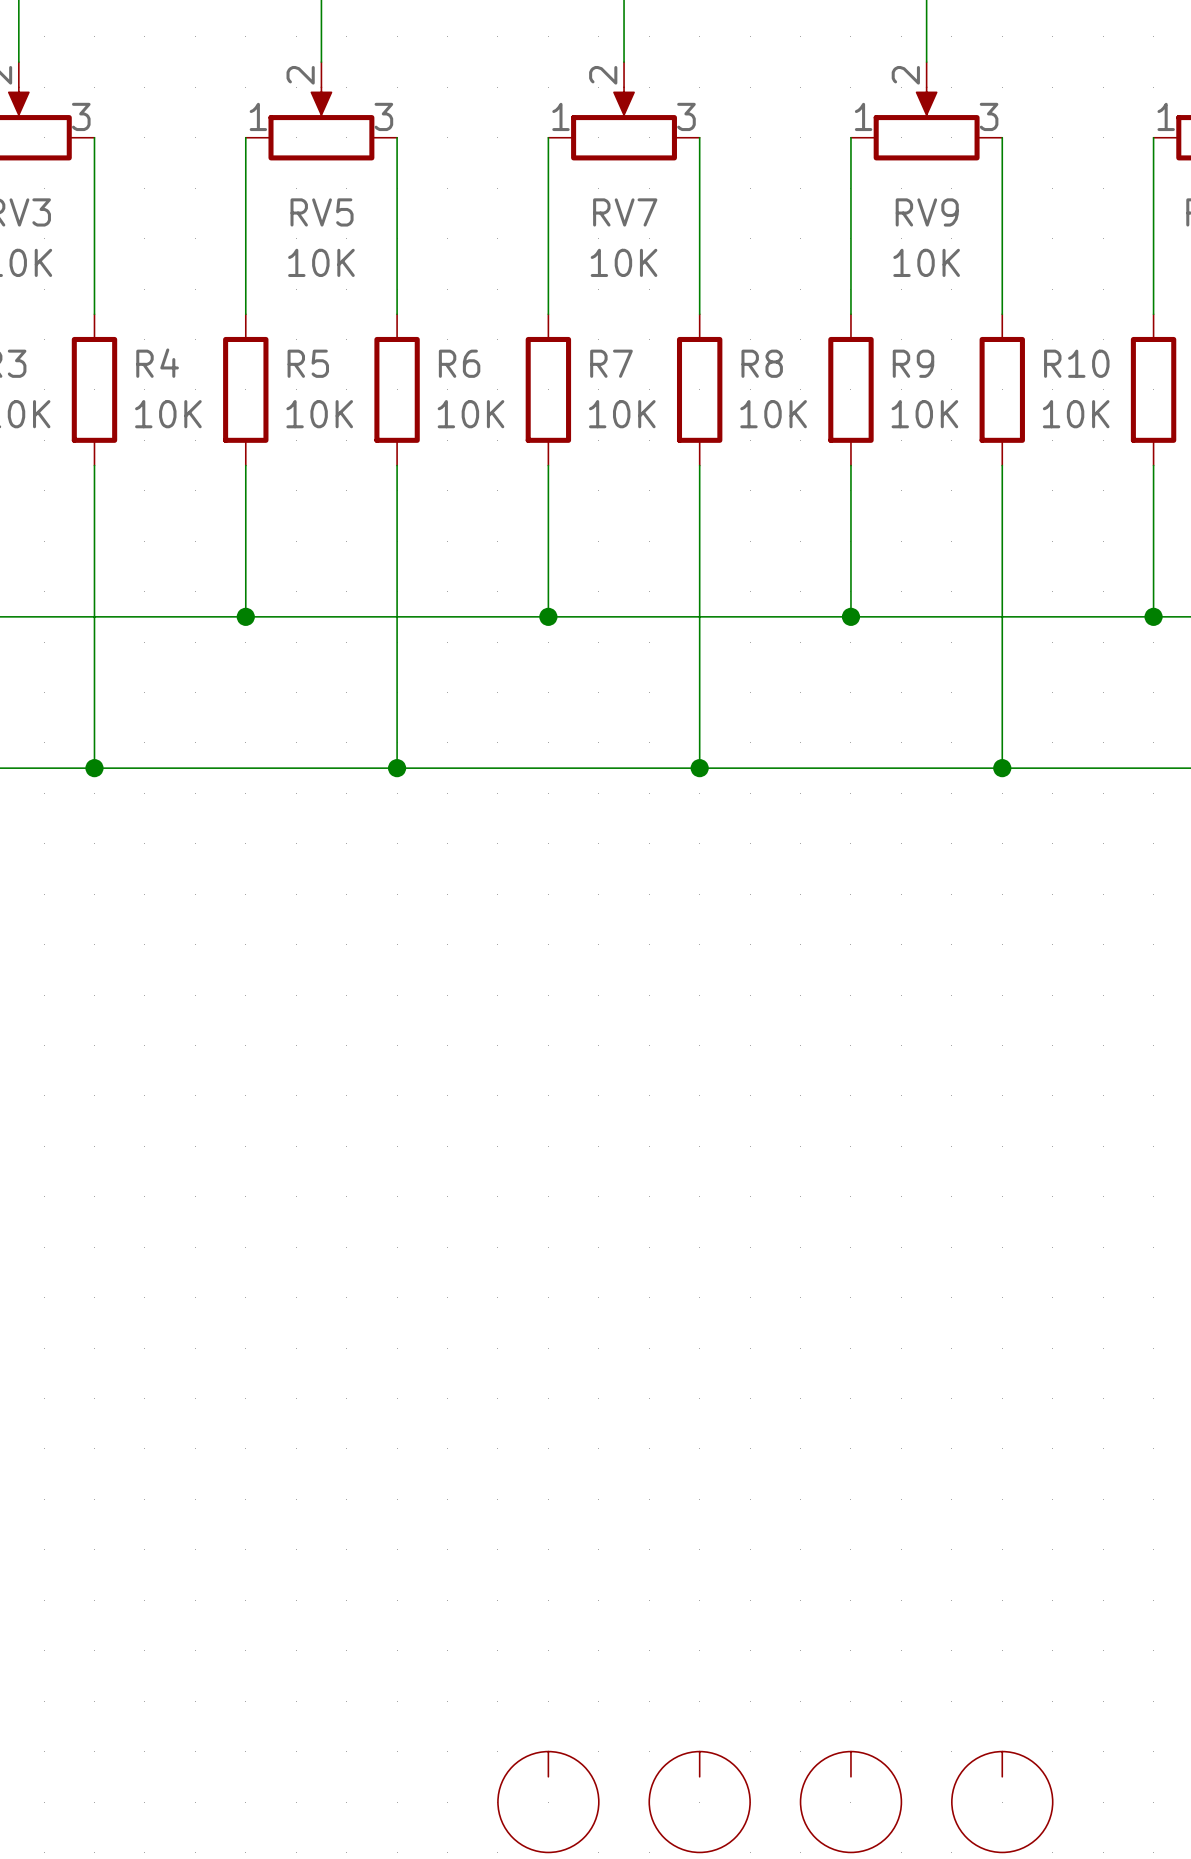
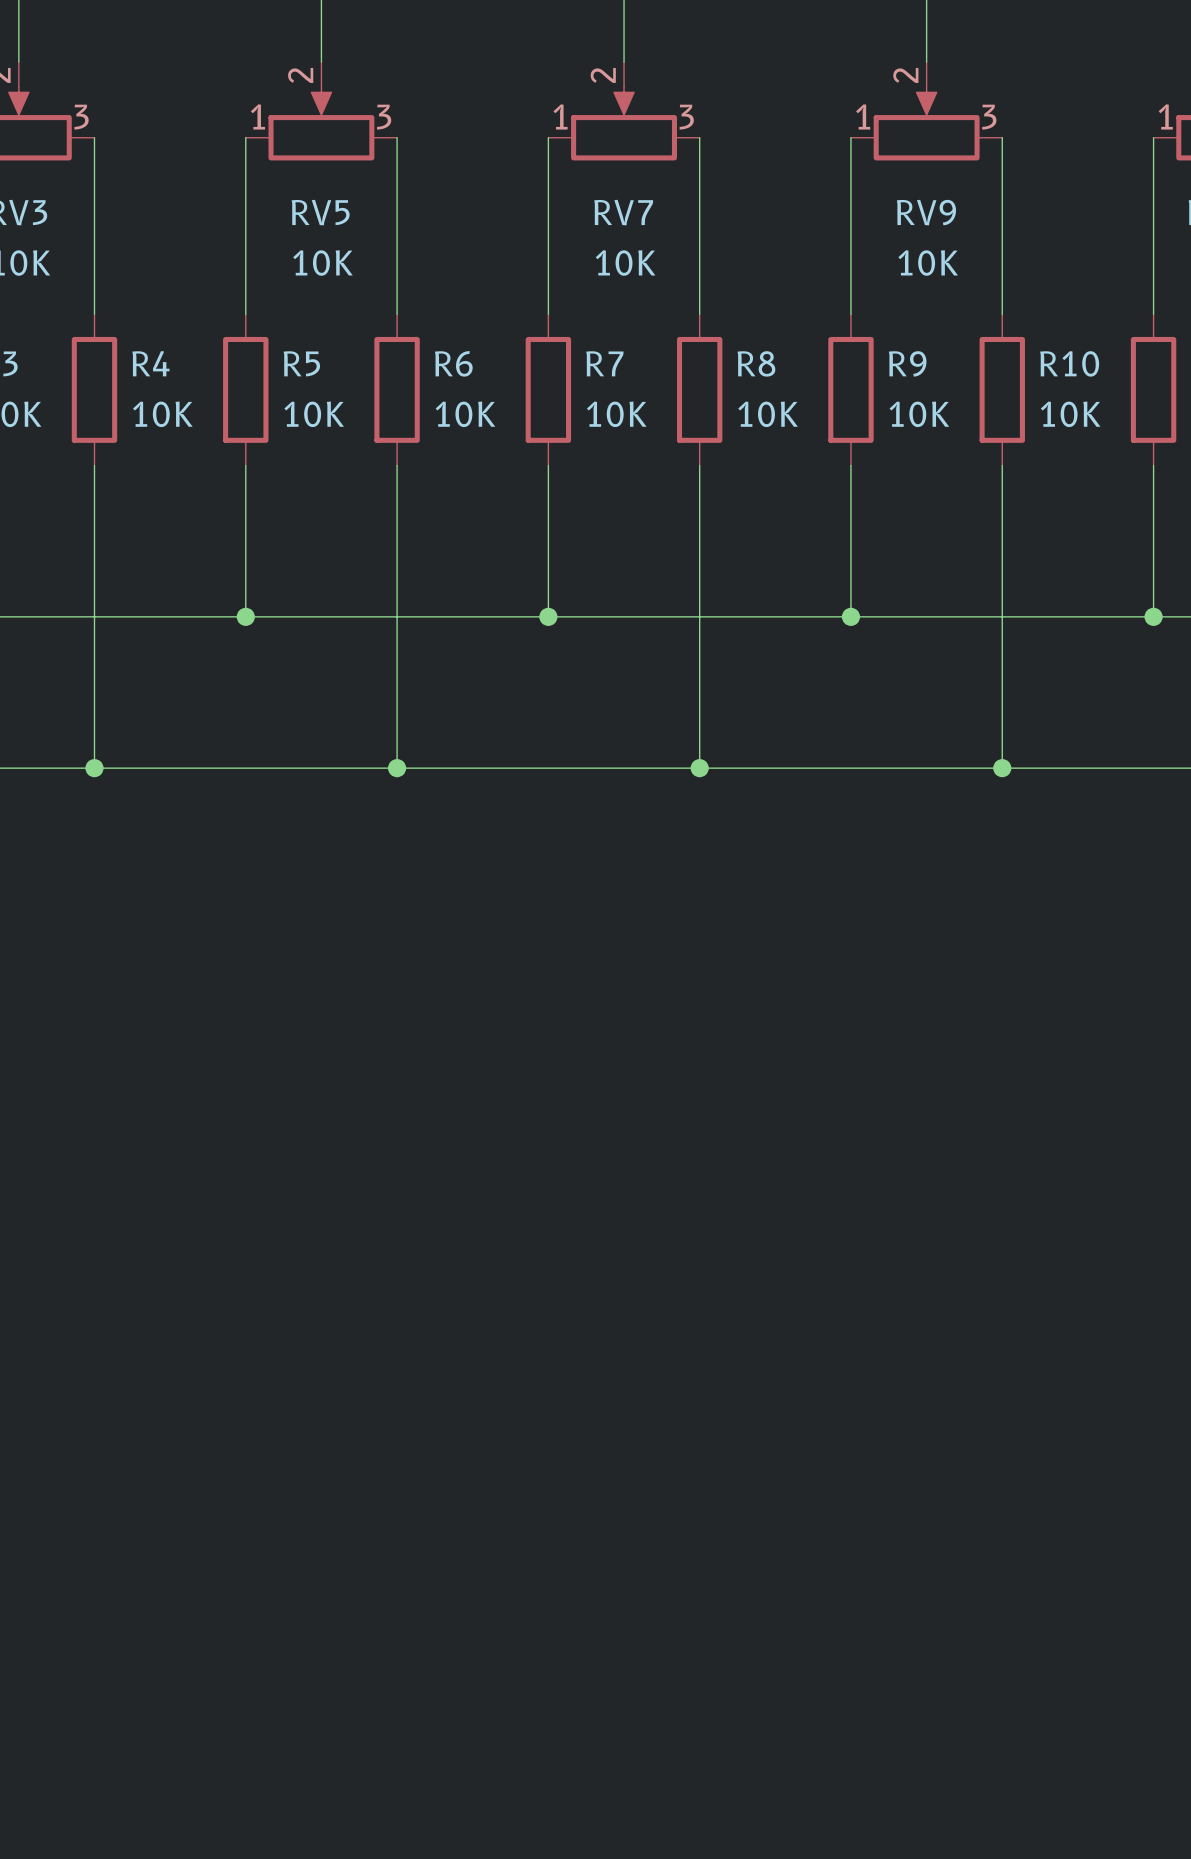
part: (548, 1802) -> none
part: (699, 1802) -> none
part: (850, 1802) -> none
part: (1002, 1802) -> none

